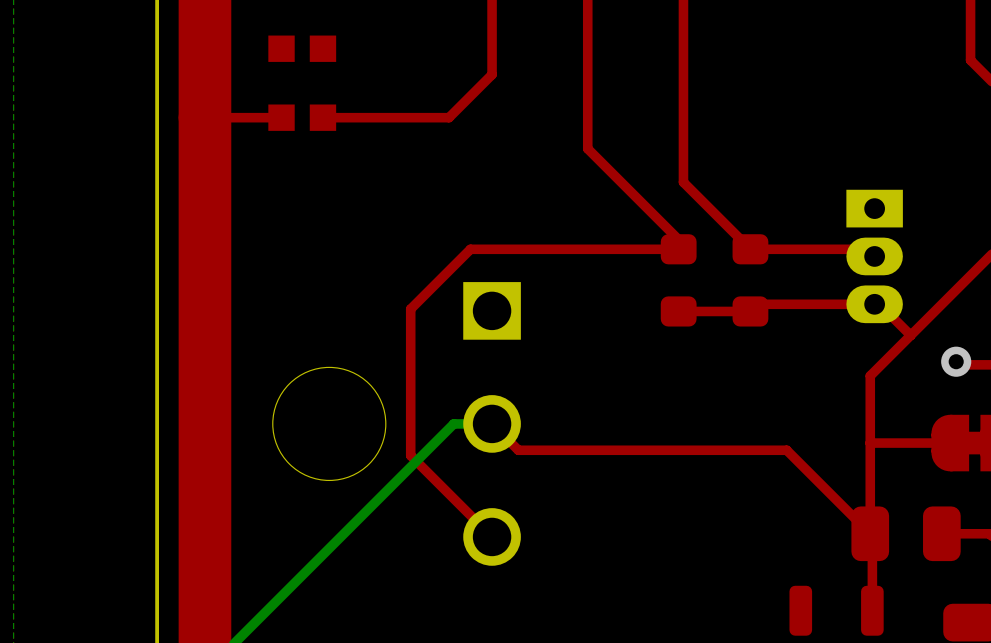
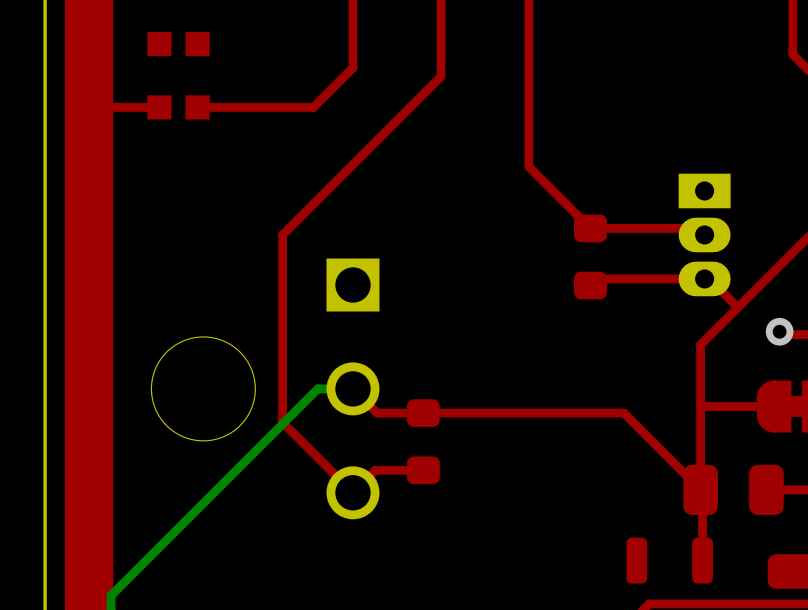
top track: (587, 84) (587, 148) (678, 239) (678, 249) (470, 249) (410, 309) (410, 455) (415, 460) -> (440, 76) (282, 234) (282, 422)
part position: (678, 280) -> (423, 441)
top track: (750, 311) (678, 311) -> none
top track: none -> (423, 470) (375, 470) (352, 492)

